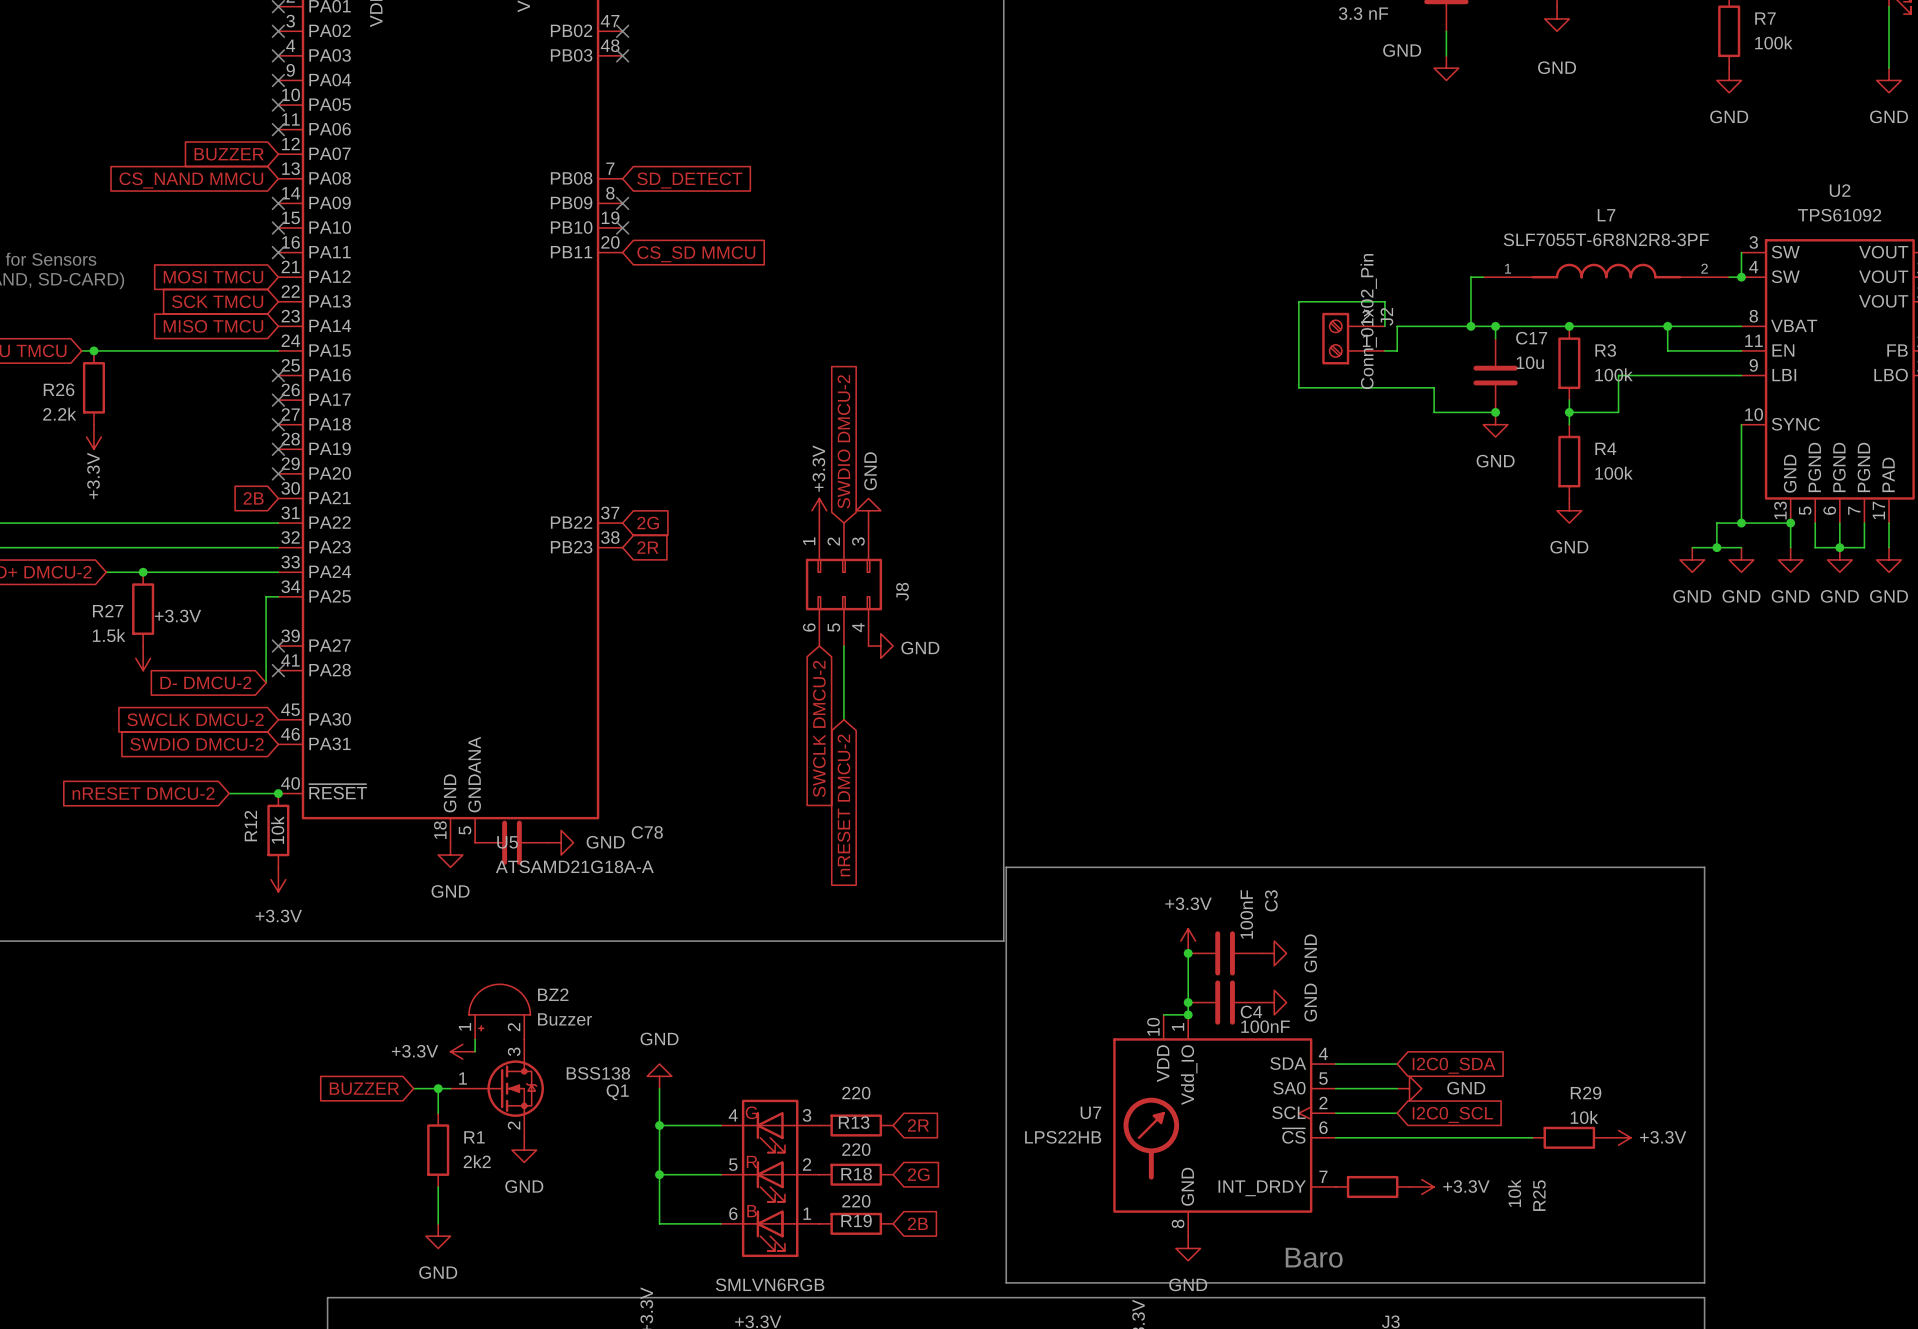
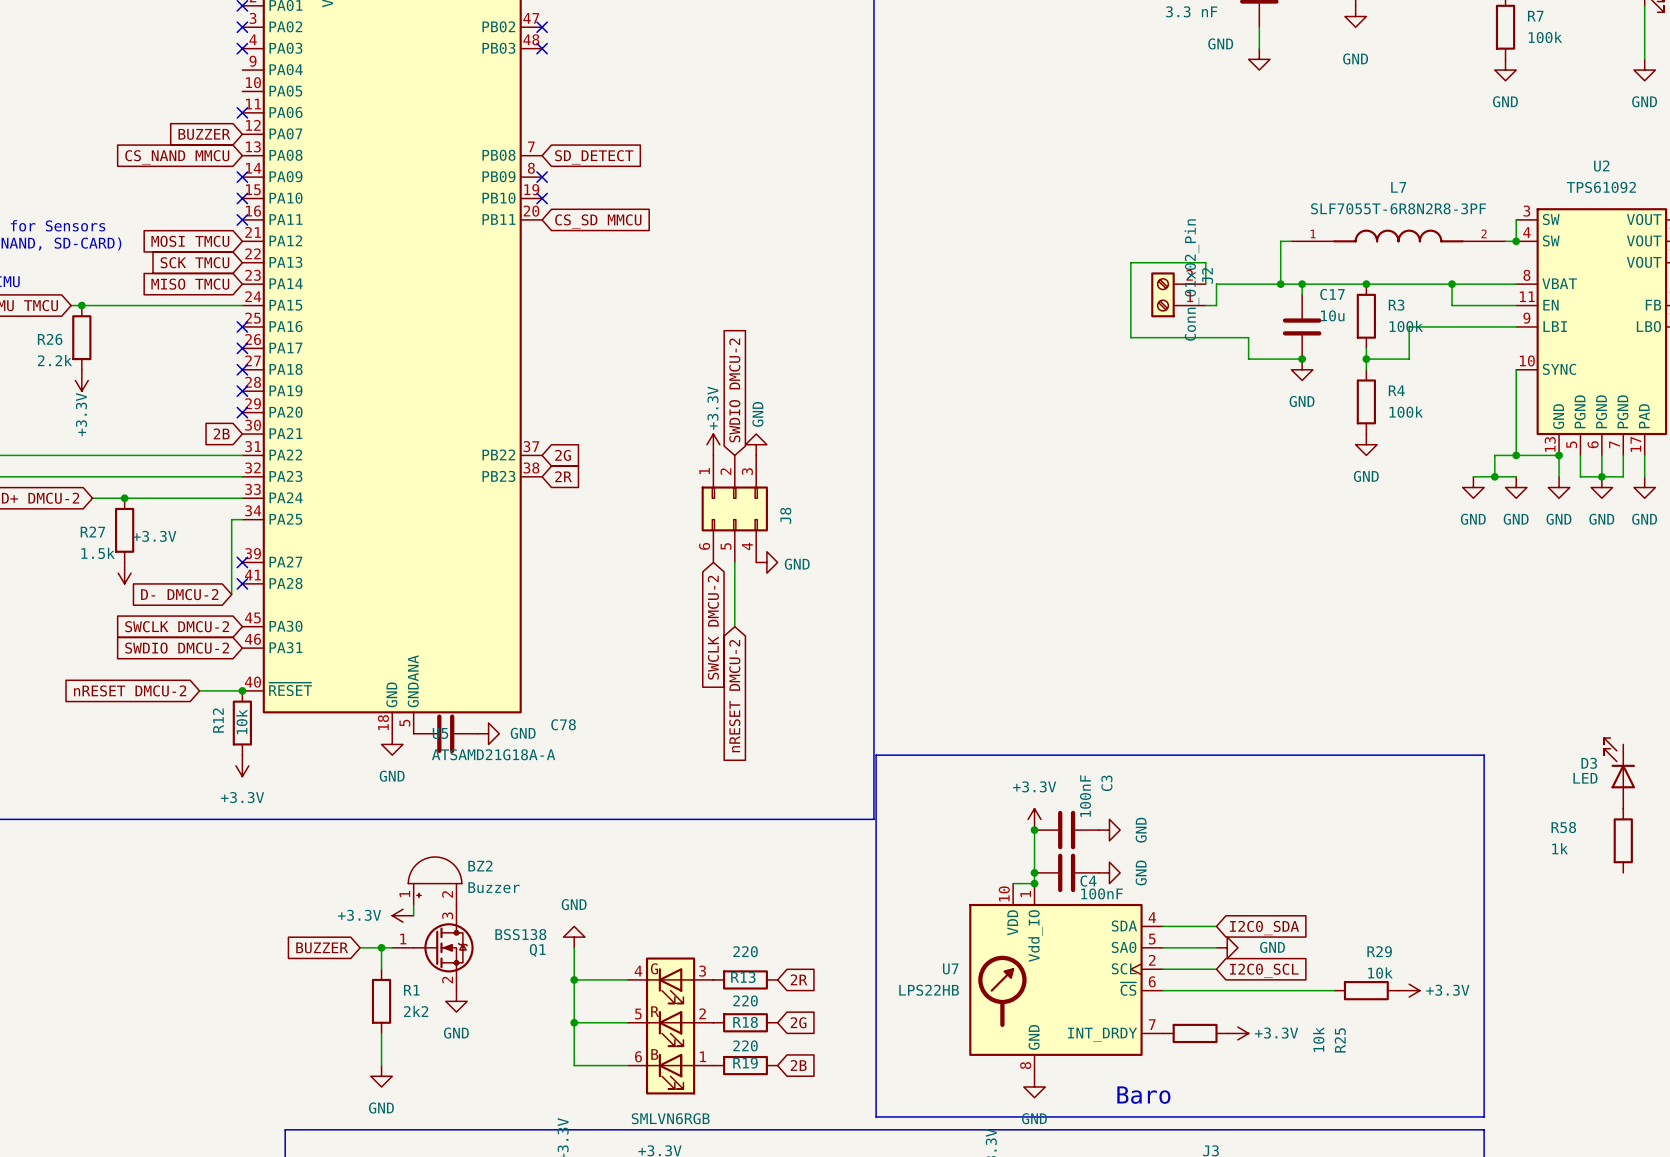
no-connect mark: (278, 80) -> none
no-connect mark: (278, 105) -> none
D3: none -> LED (1619, 773)
R58: none -> 1k (1623, 840)

